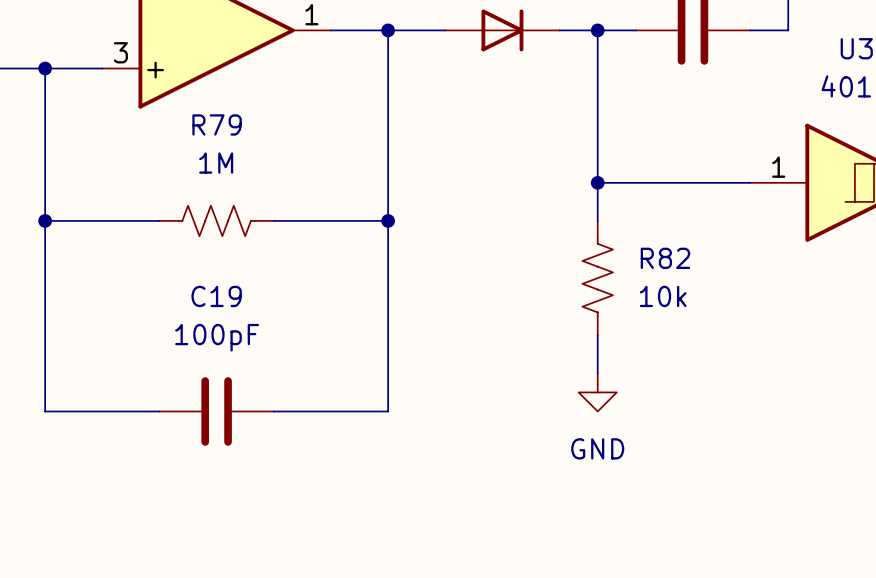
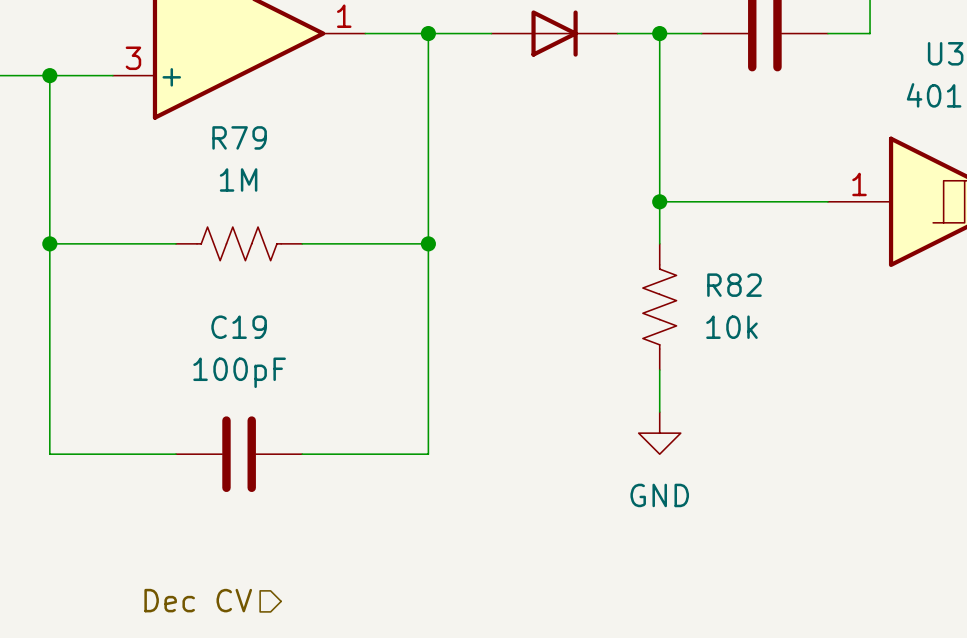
hierarchical label: none -> Dec CV (198, 600)

